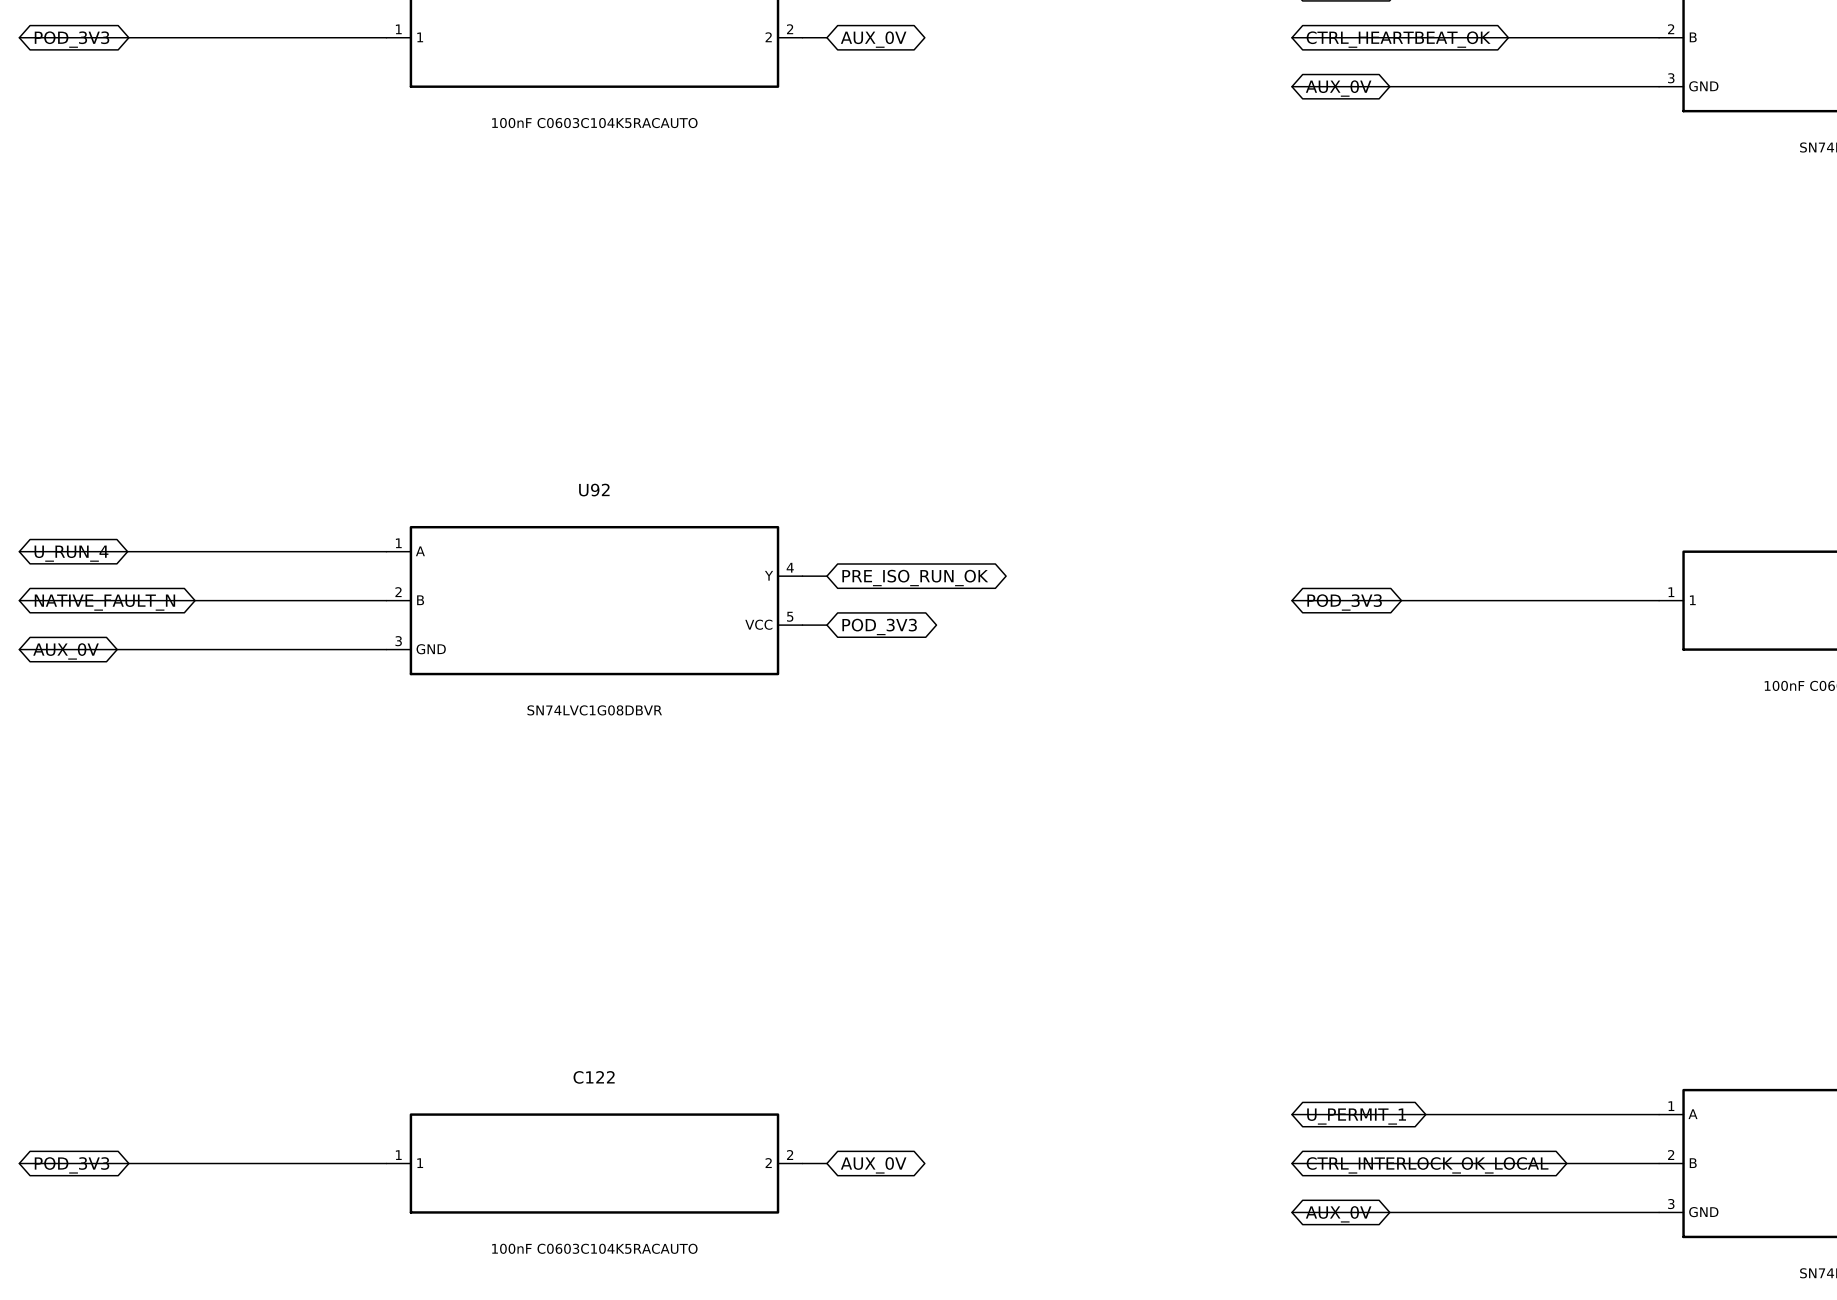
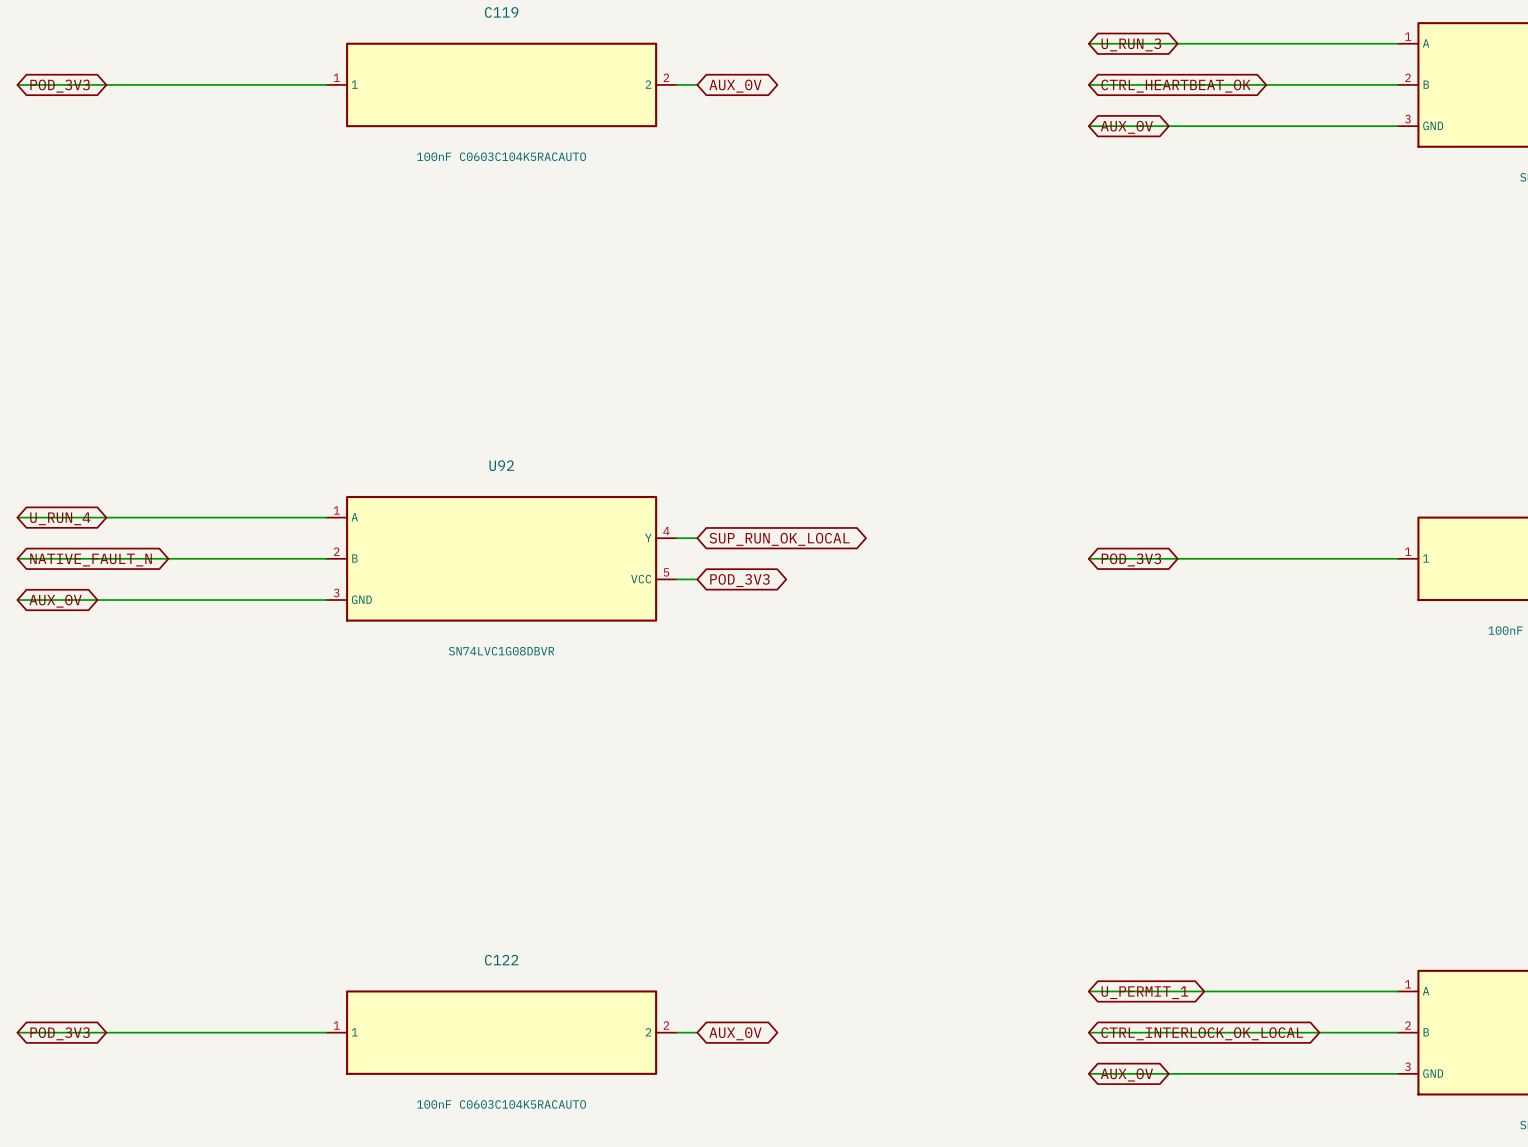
global label: PRE_ISO_RUN_OK (915, 578) -> SUP_RUN_OK_LOCAL (779, 539)

